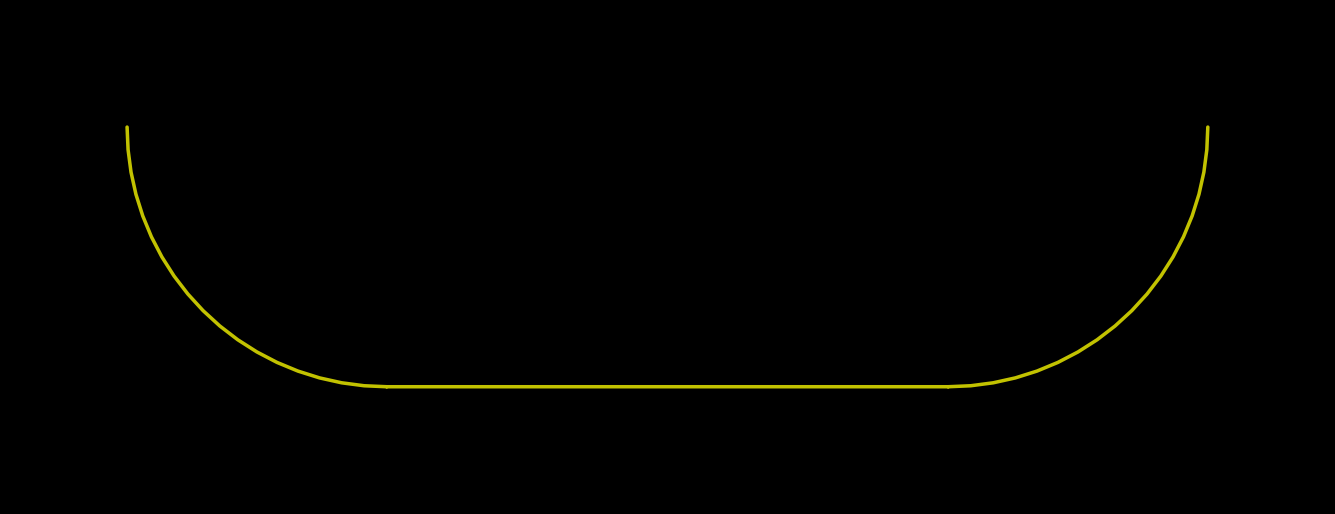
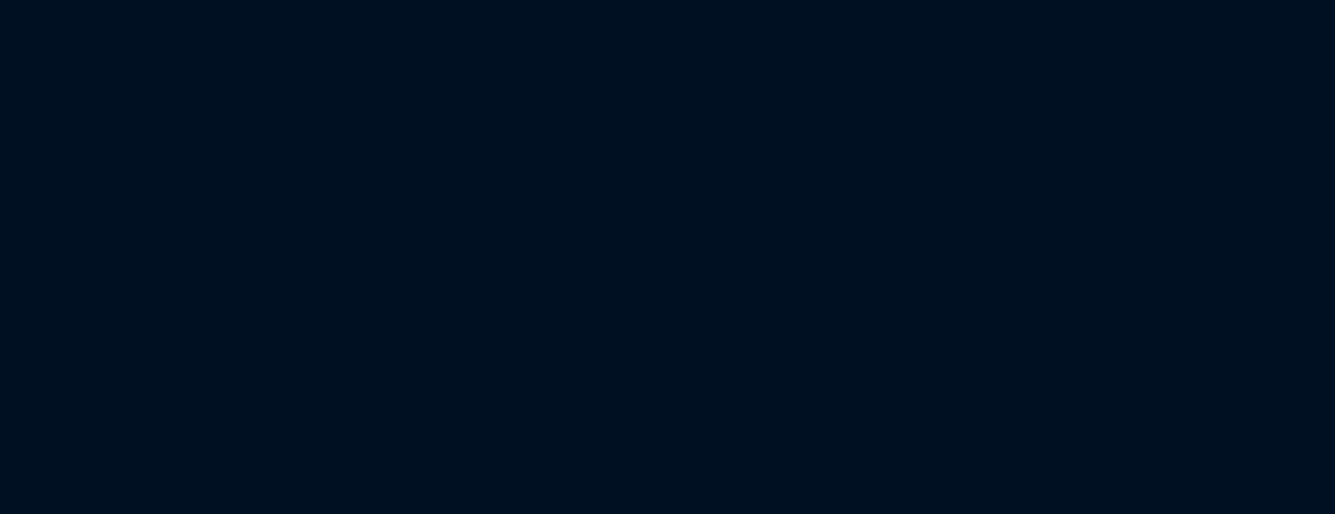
board edge: (127, 127) (131, 172) (135, 194) (151, 236) (174, 276) (203, 310) (237, 339) (277, 362) (319, 377) (341, 382) (386, 386) (948, 386) (993, 382) (1036, 371) (1057, 362) (1097, 339) (1131, 310) (1160, 276) (1183, 236) (1198, 194) (1203, 172) (1207, 127) -> none

